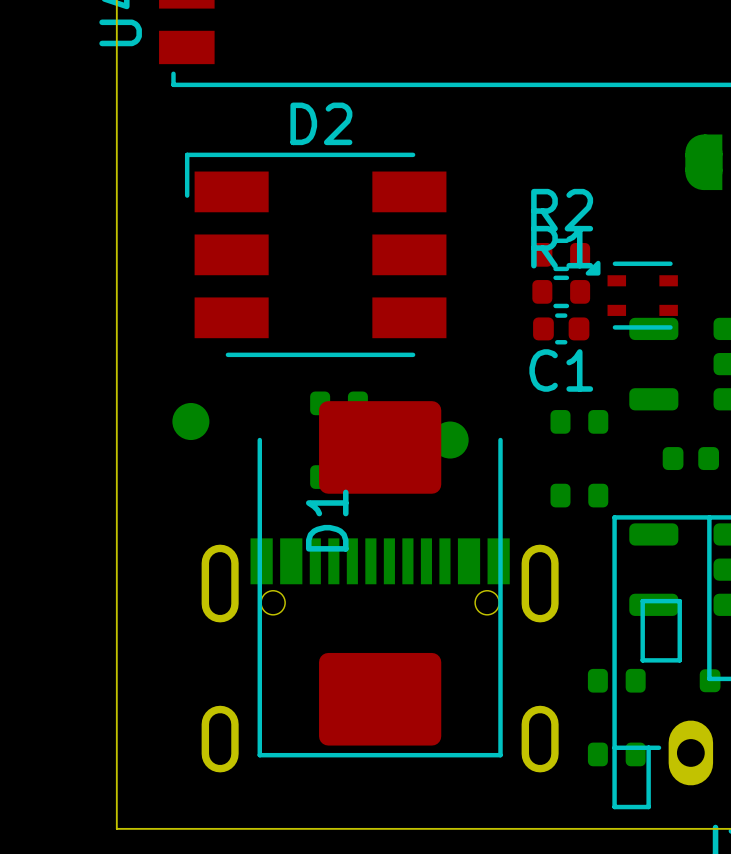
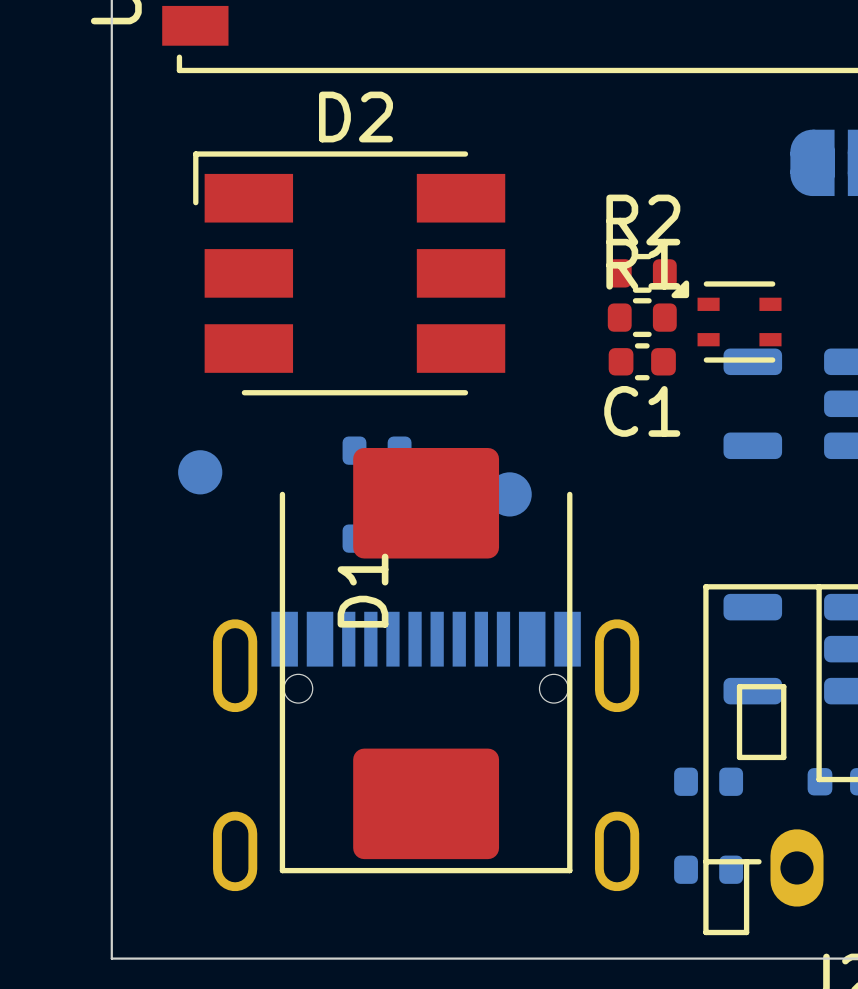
part: (579, 421) -> none
part: (690, 458) -> none
part: (579, 495) -> none

